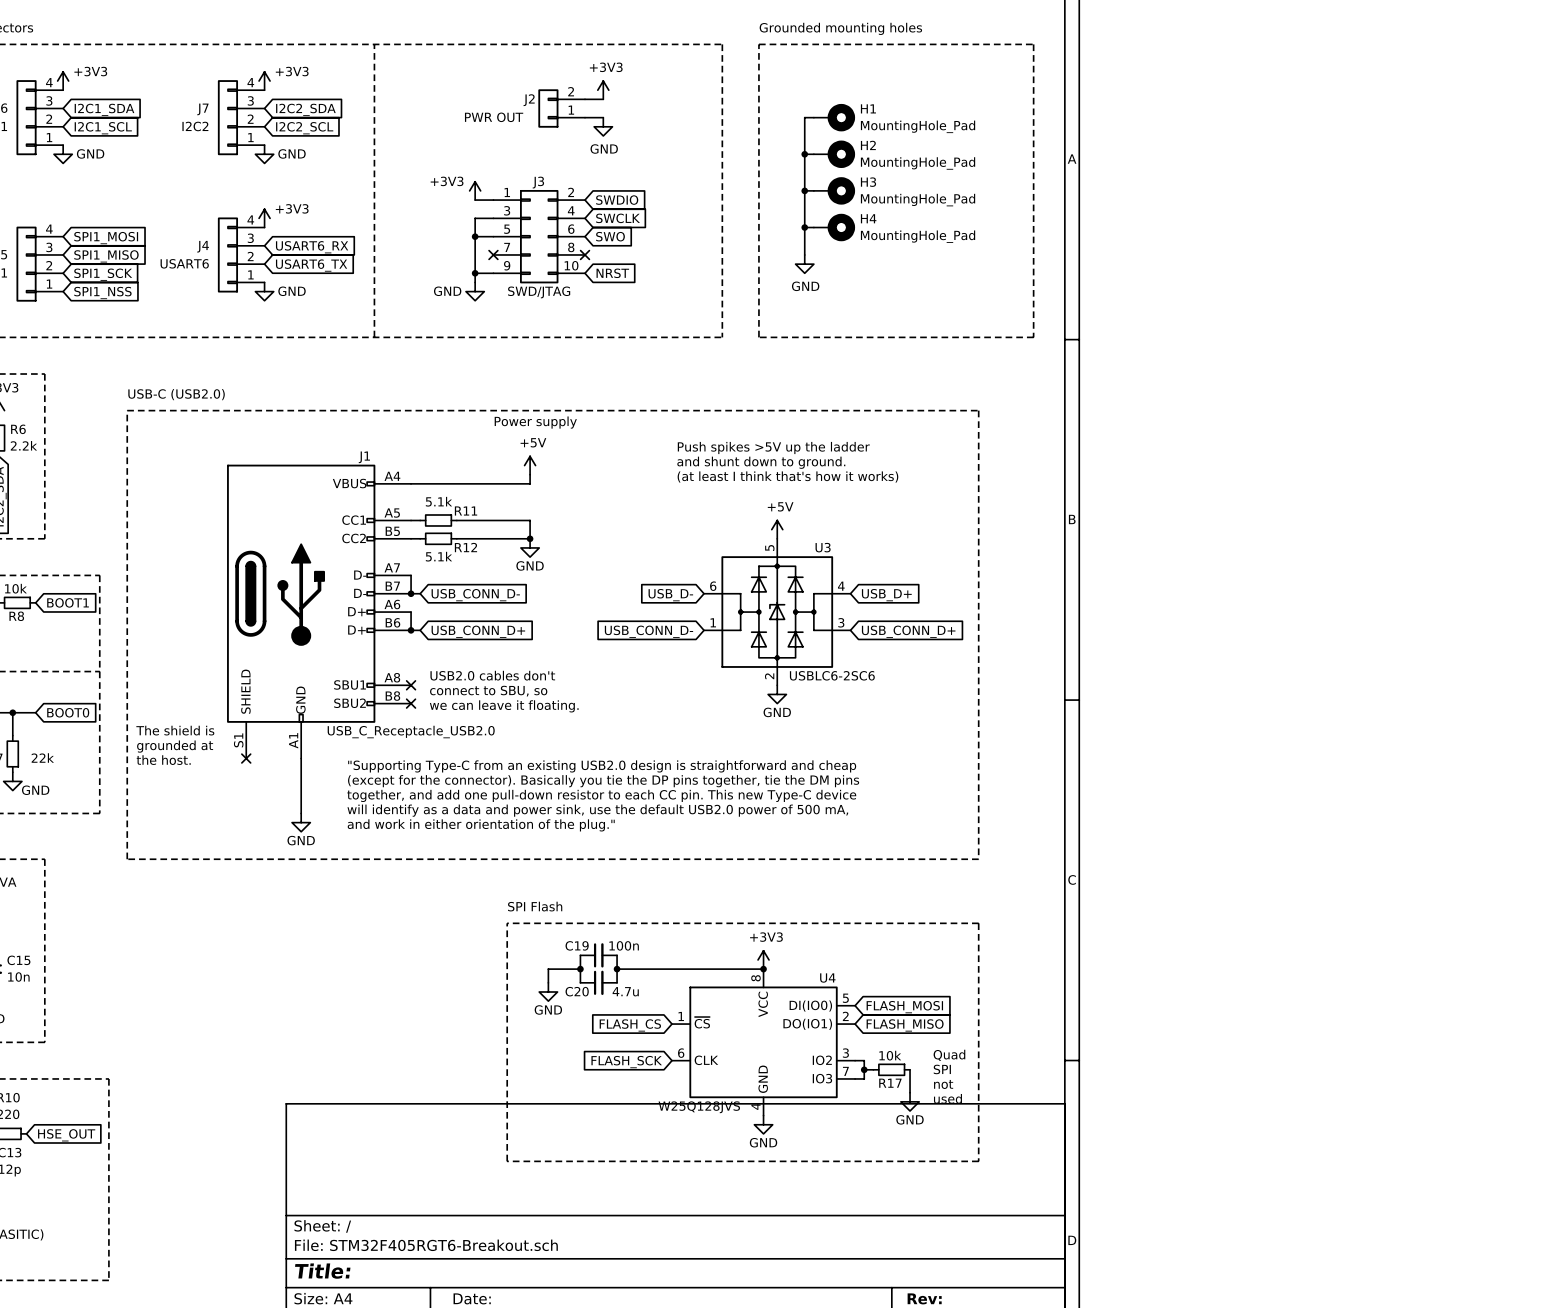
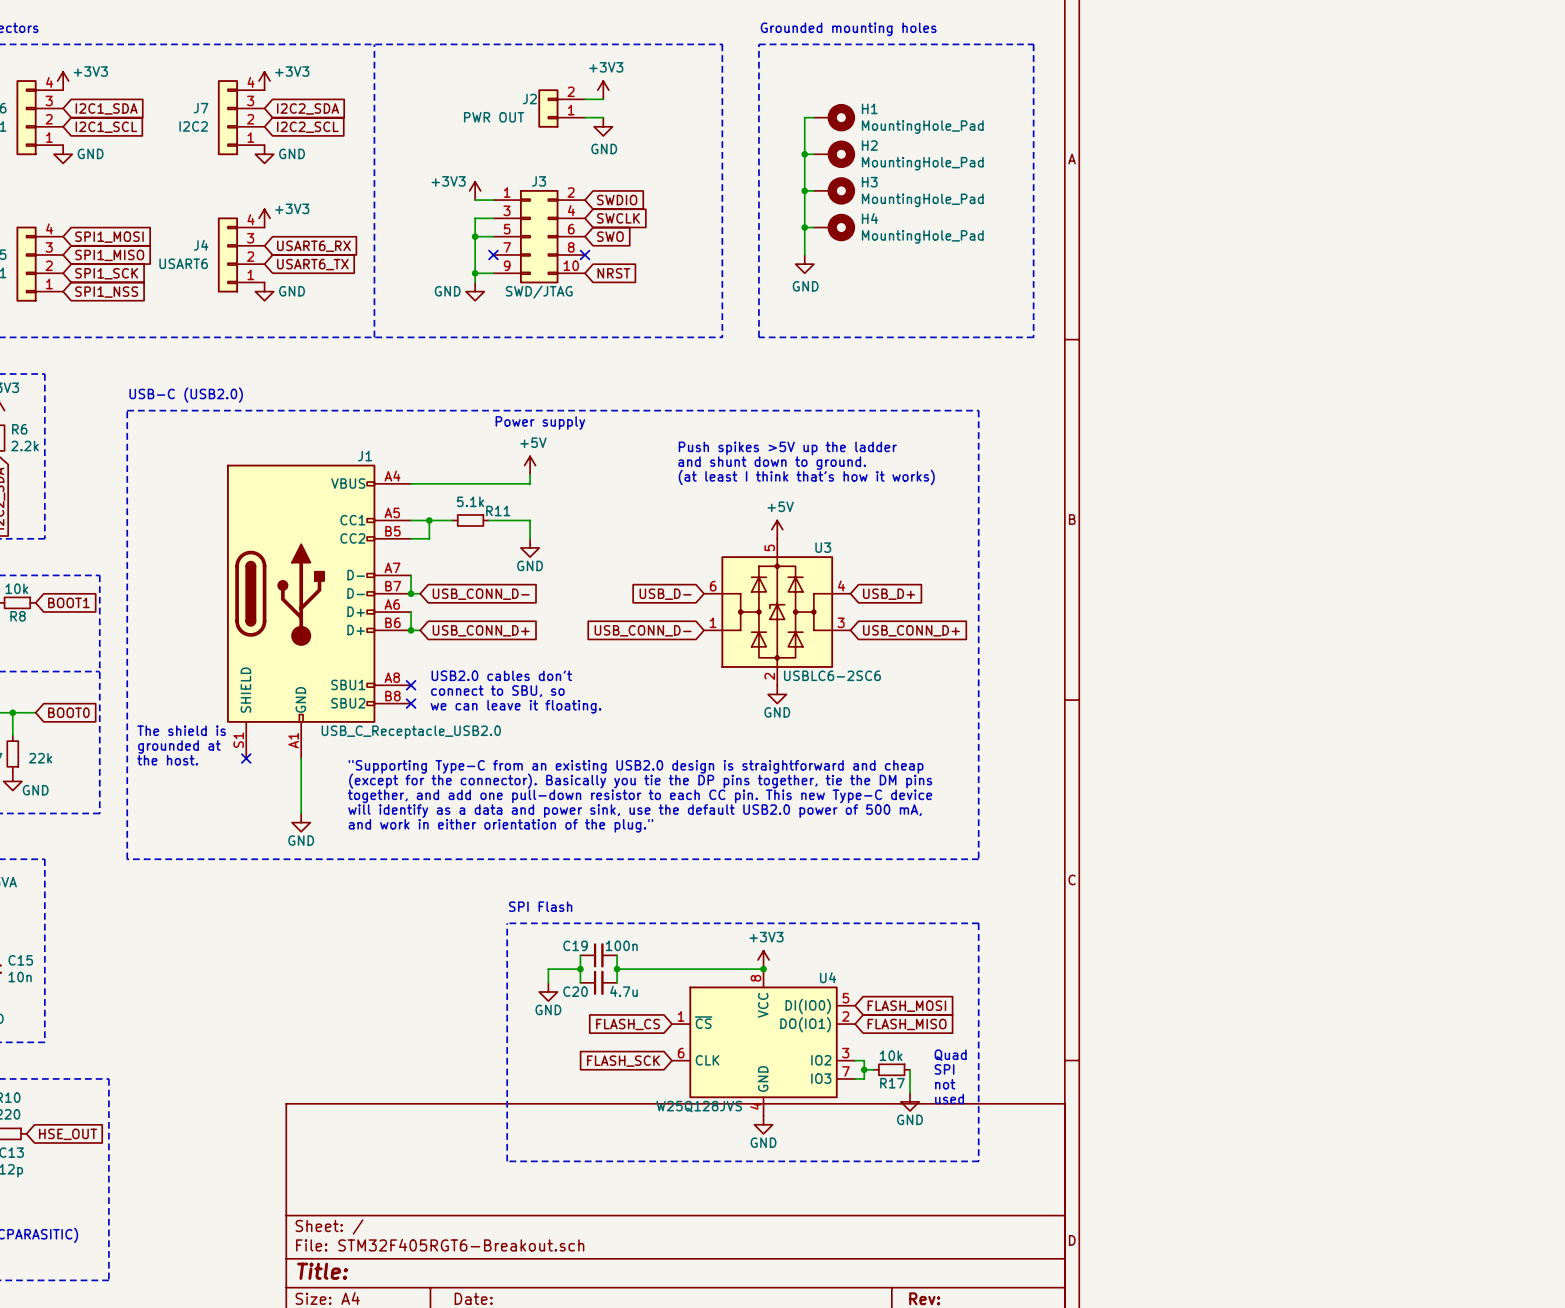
wire: none -> (429, 520) (429, 538) (420, 538)
junction: none -> (429, 520)
R11 position: (438, 520) -> (470, 520)
wire: (456, 520) (488, 520) -> (420, 520) (452, 520)
R12: 5.1k (438, 538) -> none
wire: (456, 538) (530, 538) -> none
junction: (530, 538) -> none

